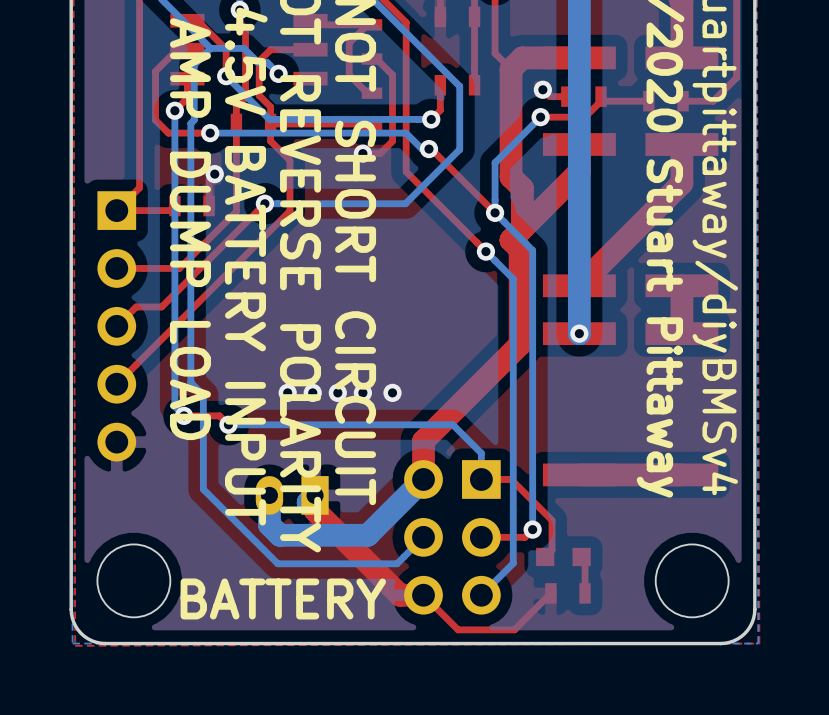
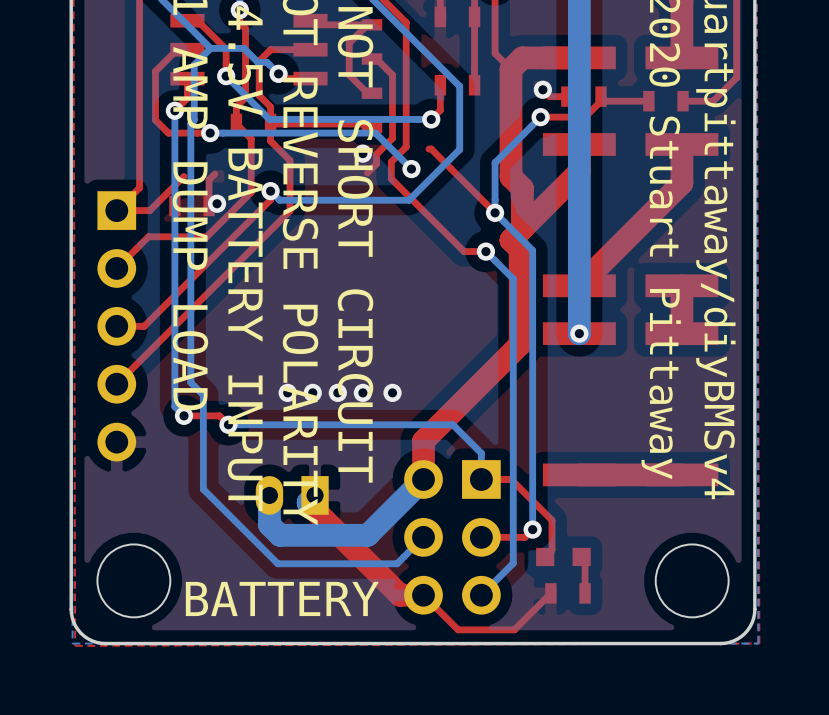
top track: (236, 123) (236, 211) (179, 268) (116, 268) -> (236, 123) (251, 138) (251, 192) (206, 236) (148, 236) (116, 268)
bottom track: (375, 133) (406, 133) (421, 149) (428, 149) -> (375, 133) (411, 169)
top track: (392, 138) (392, 141) (380, 153) (362, 153) -> (392, 138) (376, 154) (376, 163) (367, 172)
top track: (406, 146) (406, 171) (485, 251) -> (406, 146) (391, 161) (391, 178) (464, 251) (485, 251)
via position: (428, 149) -> (411, 169)
via: (214, 174) -> none
bottom track: (408, 200) (405, 203) (264, 203) -> (408, 200) (279, 200) (270, 191)
via: none -> (217, 203)
top track: (264, 203) (161, 306) (136, 306) (116, 326) -> (270, 191) (270, 199) (144, 326) (116, 326)
via position: (264, 203) -> (270, 191)
top track: (174, 206) (170, 210) (149, 210) -> (184, 176) (149, 210)

